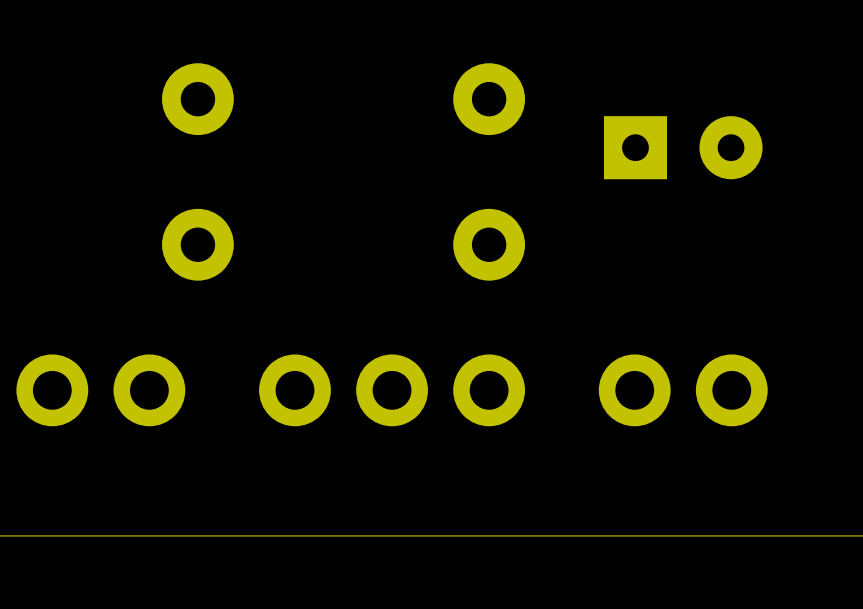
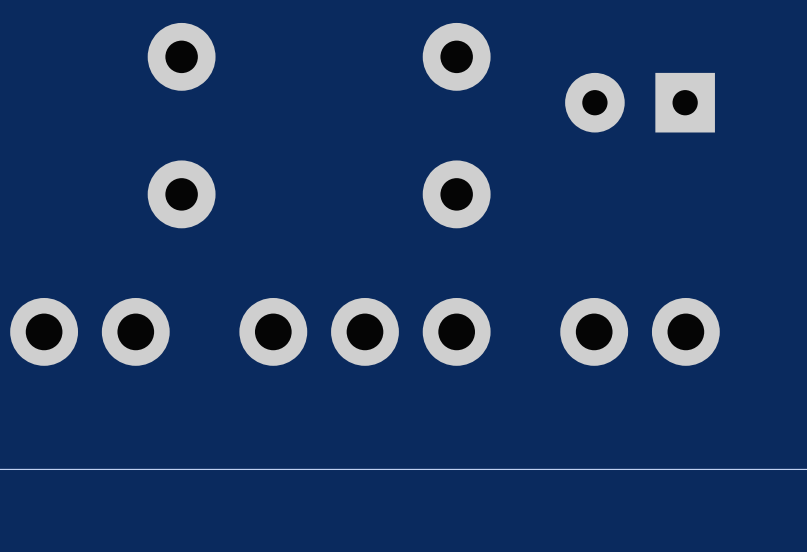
part rotation: 0° (683, 147) -> 180° (640, 102)

